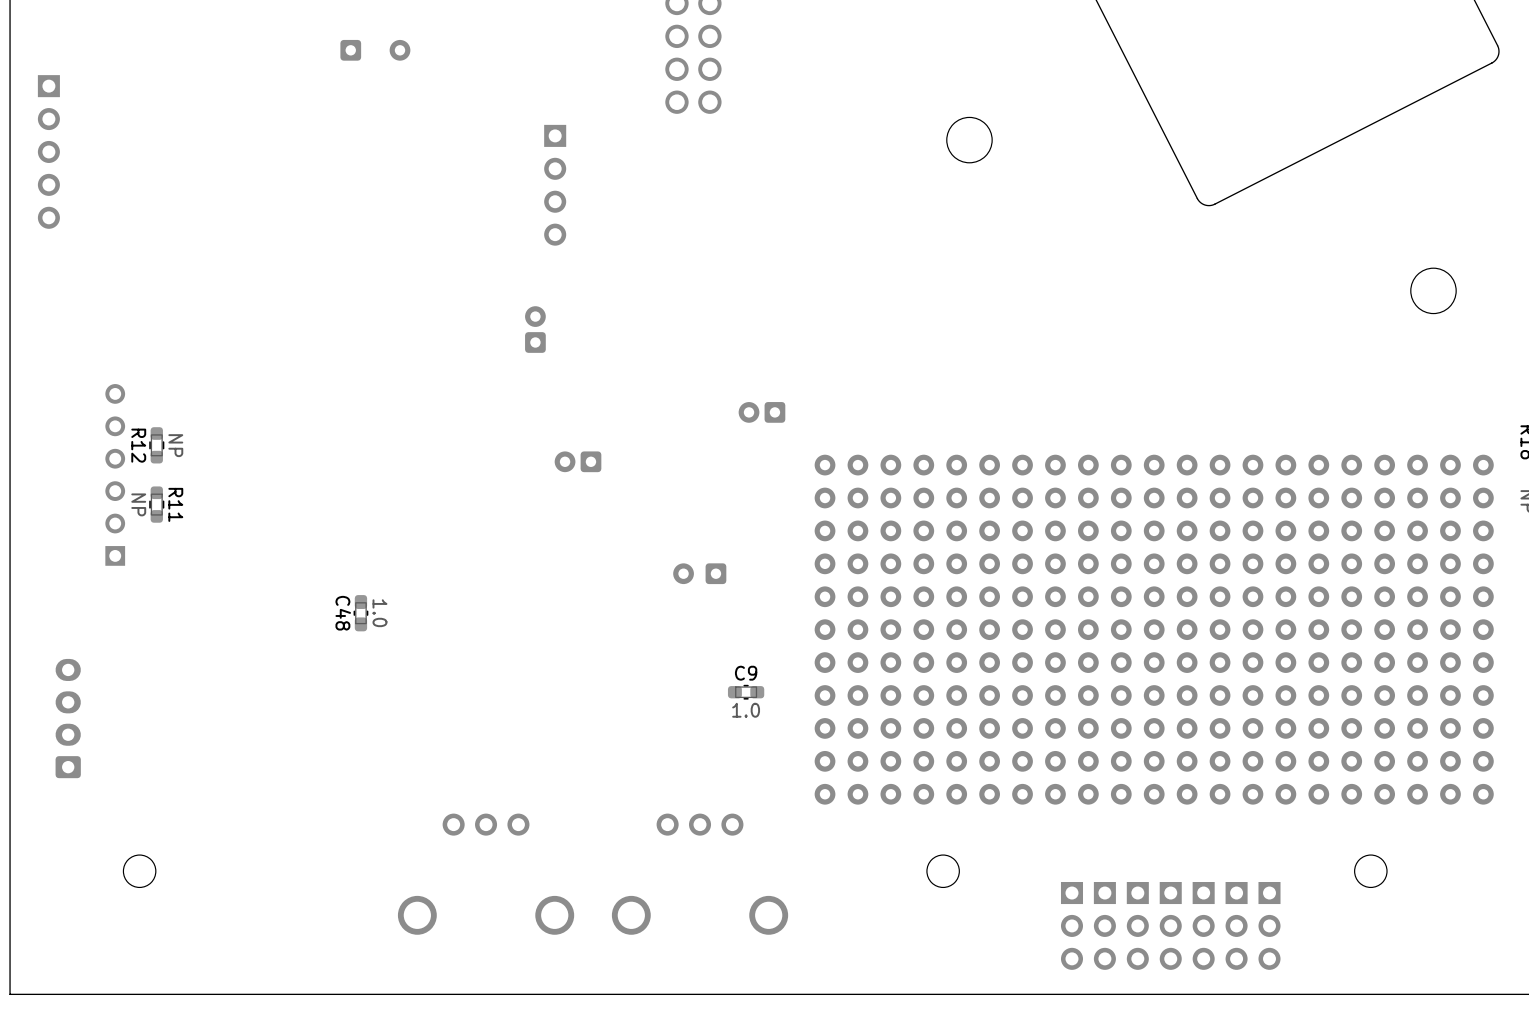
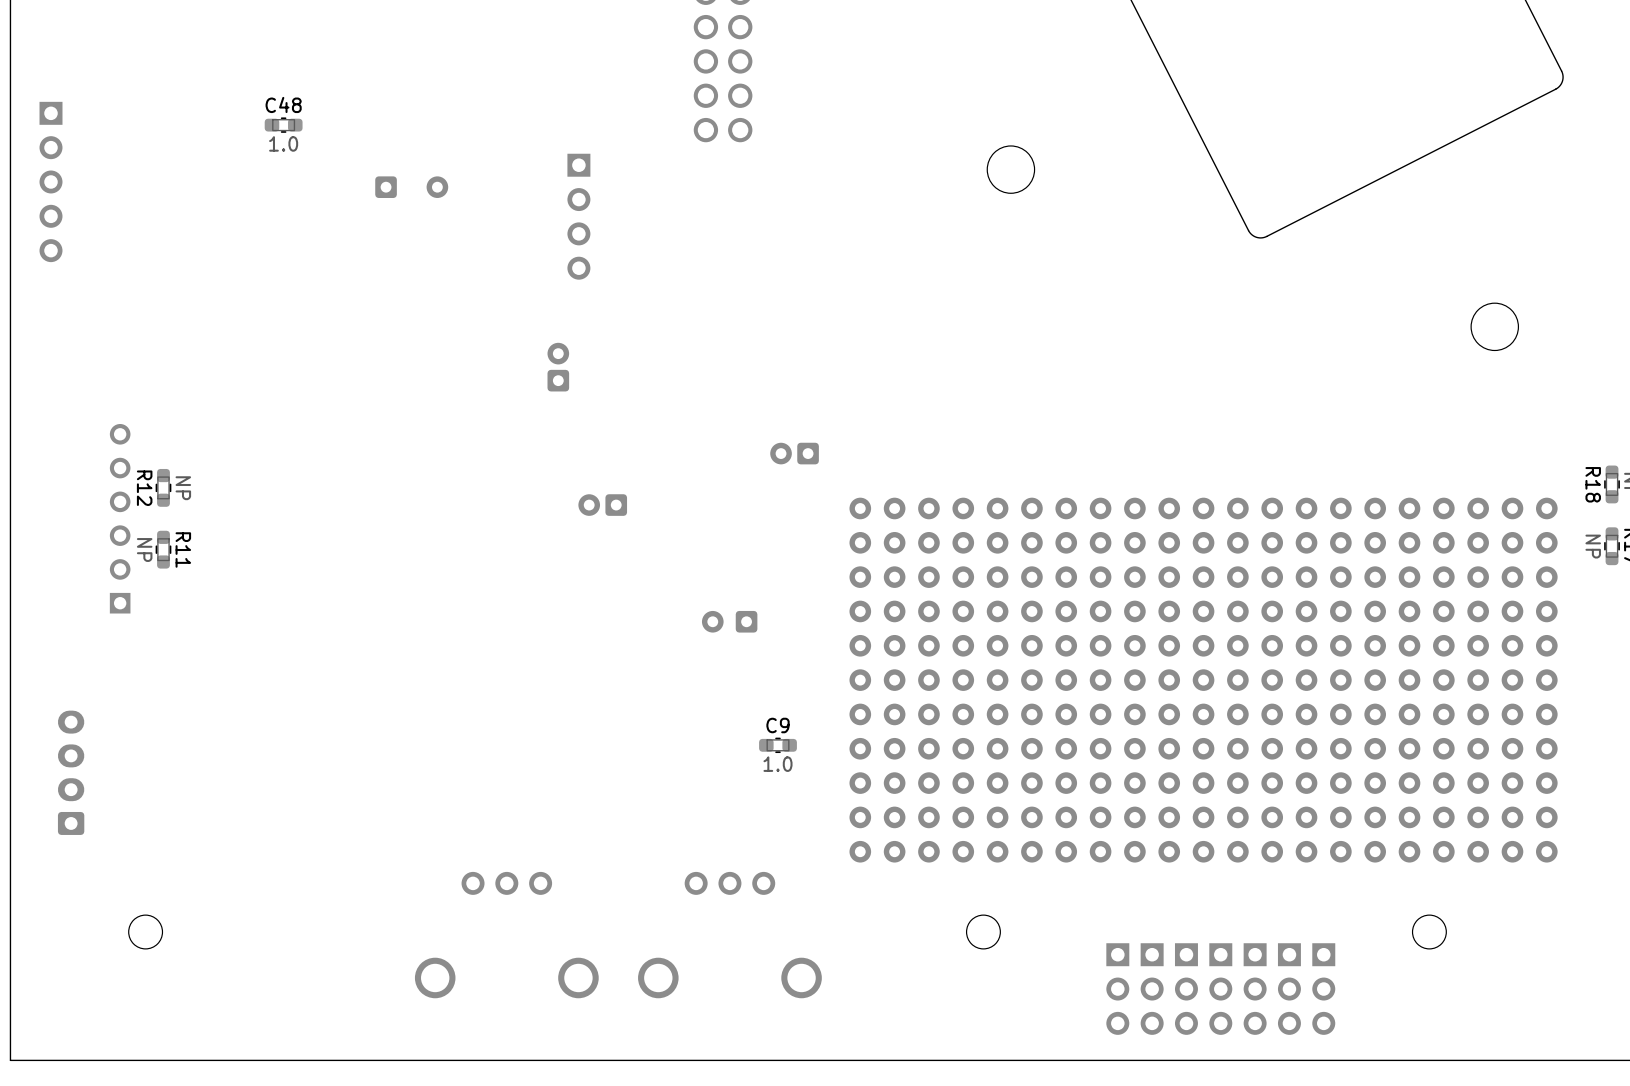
part position: (375, 50) -> (411, 187)
C48 rotation: 0° (360, 613) -> 90° clockwise (283, 125)
C48 position: (360, 613) -> (283, 125)

